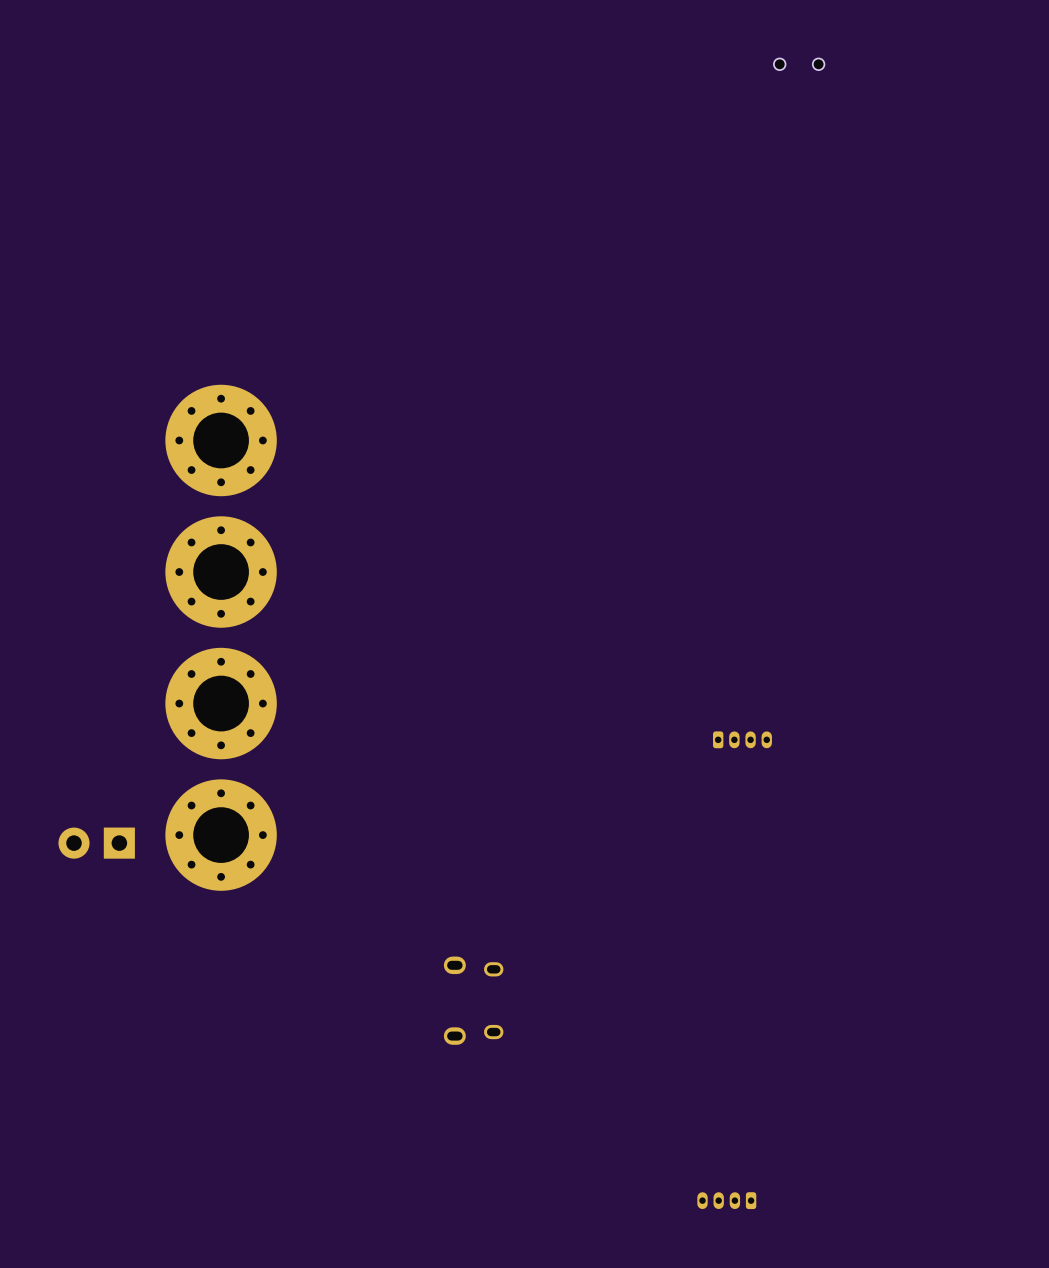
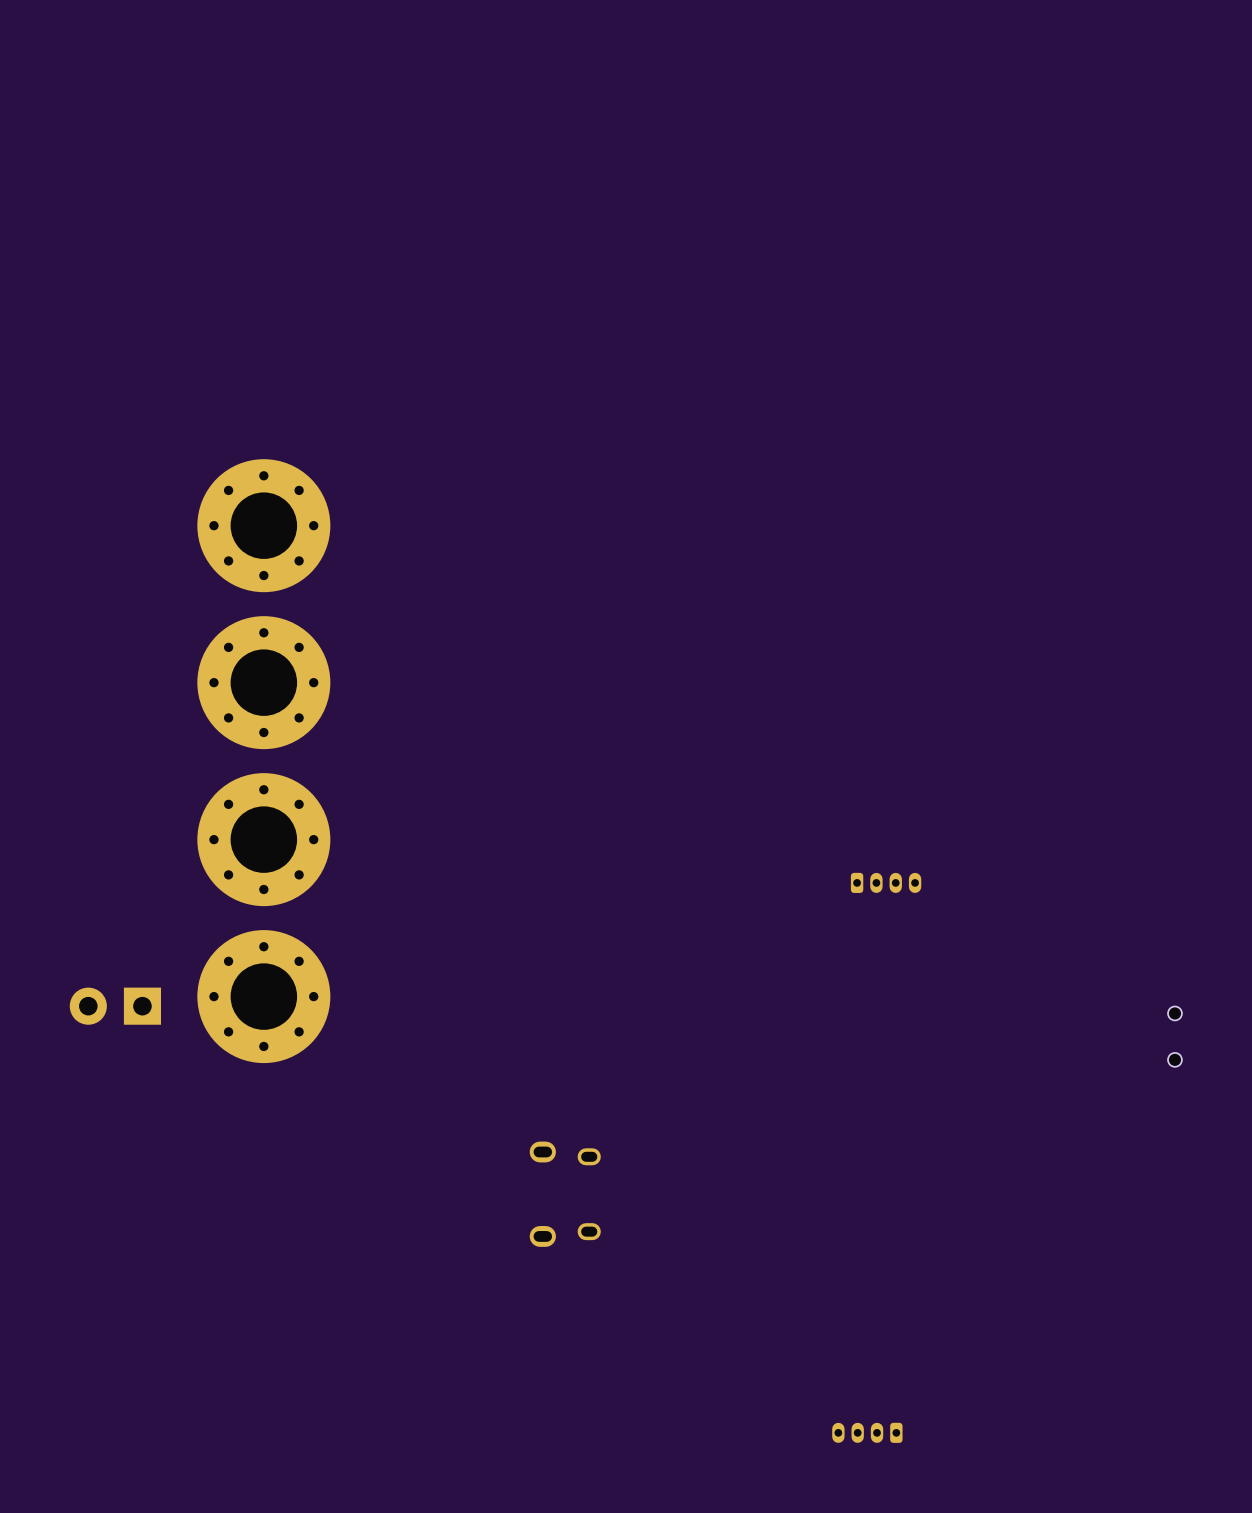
part: (799, 64) -> none
part: none -> (1174, 1036)

